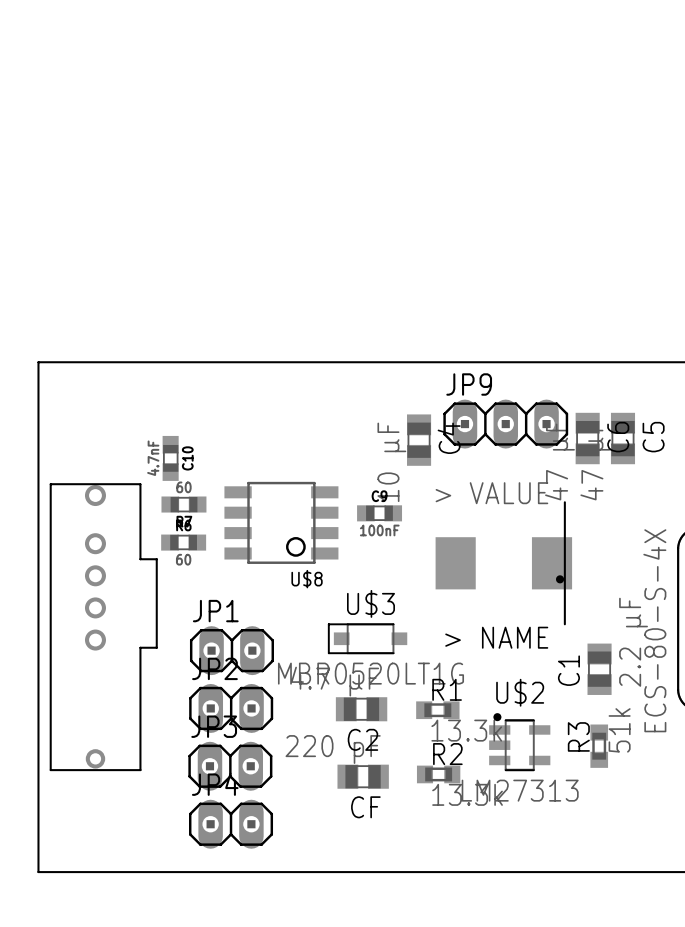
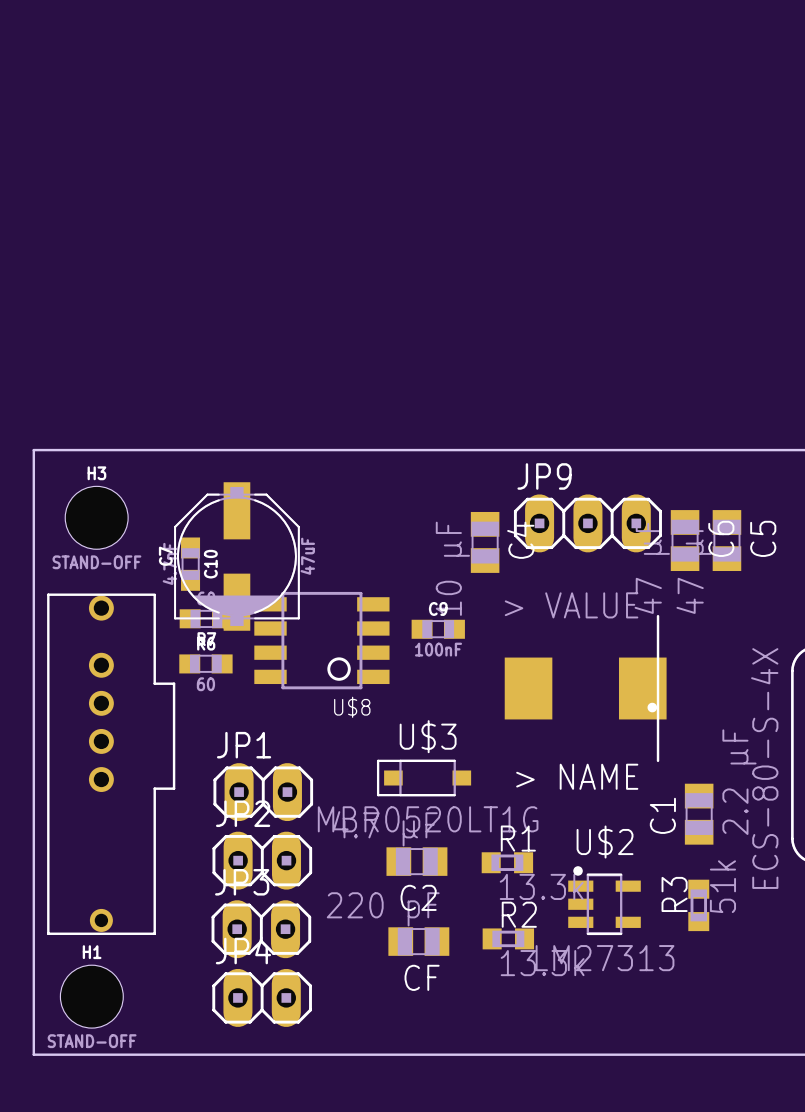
H3: none -> STAND-OFF (96, 517)
C7: none -> 47uF (236, 556)
H1: none -> STAND-OFF (91, 996)

